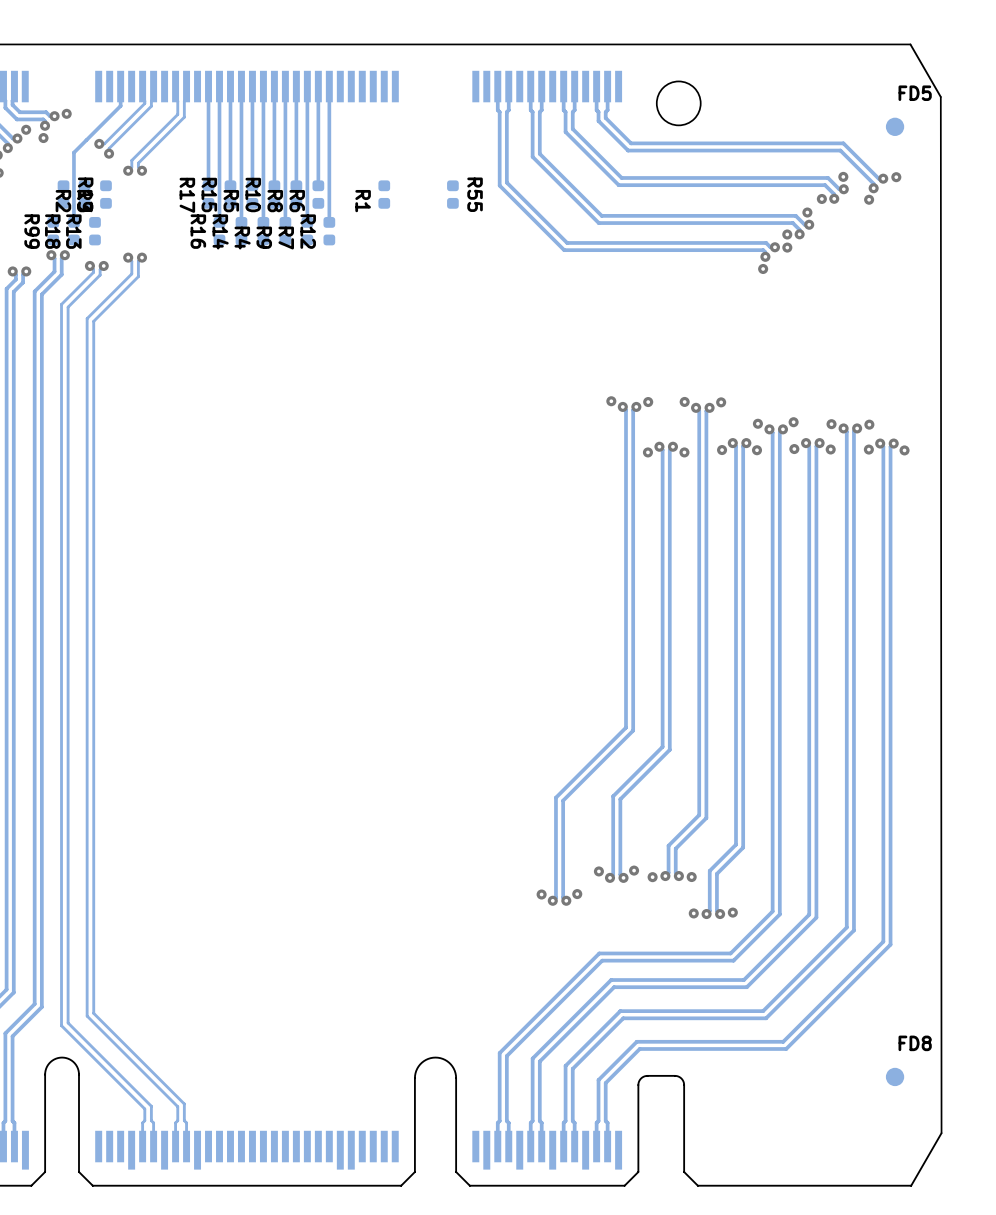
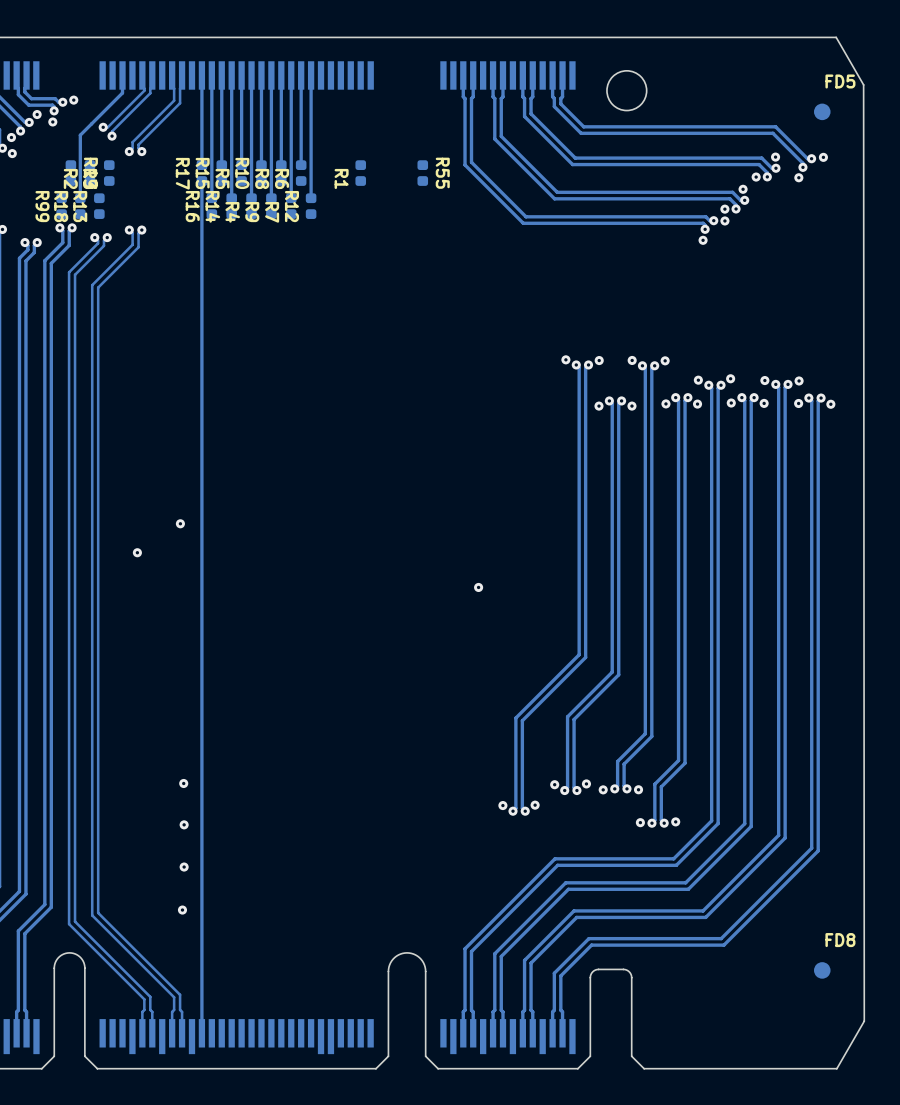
track: none -> (201, 181) (201, 1033)
via: none -> (180, 523)
via: none -> (137, 552)
via: none -> (478, 587)
via: none -> (183, 783)
via: none -> (184, 824)
via: none -> (184, 867)
via: none -> (182, 910)

